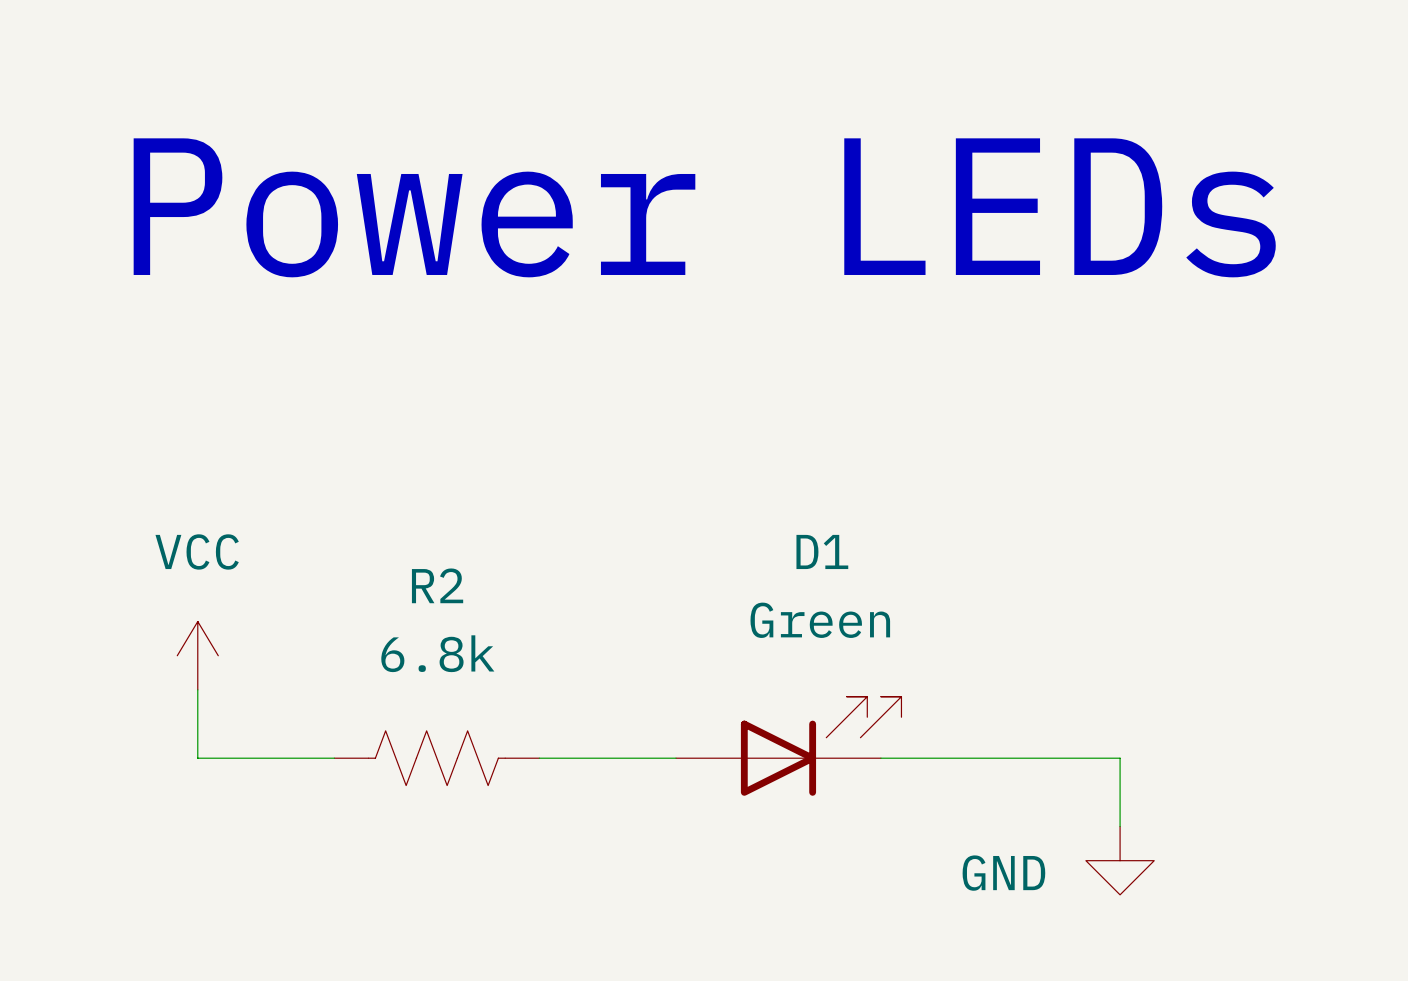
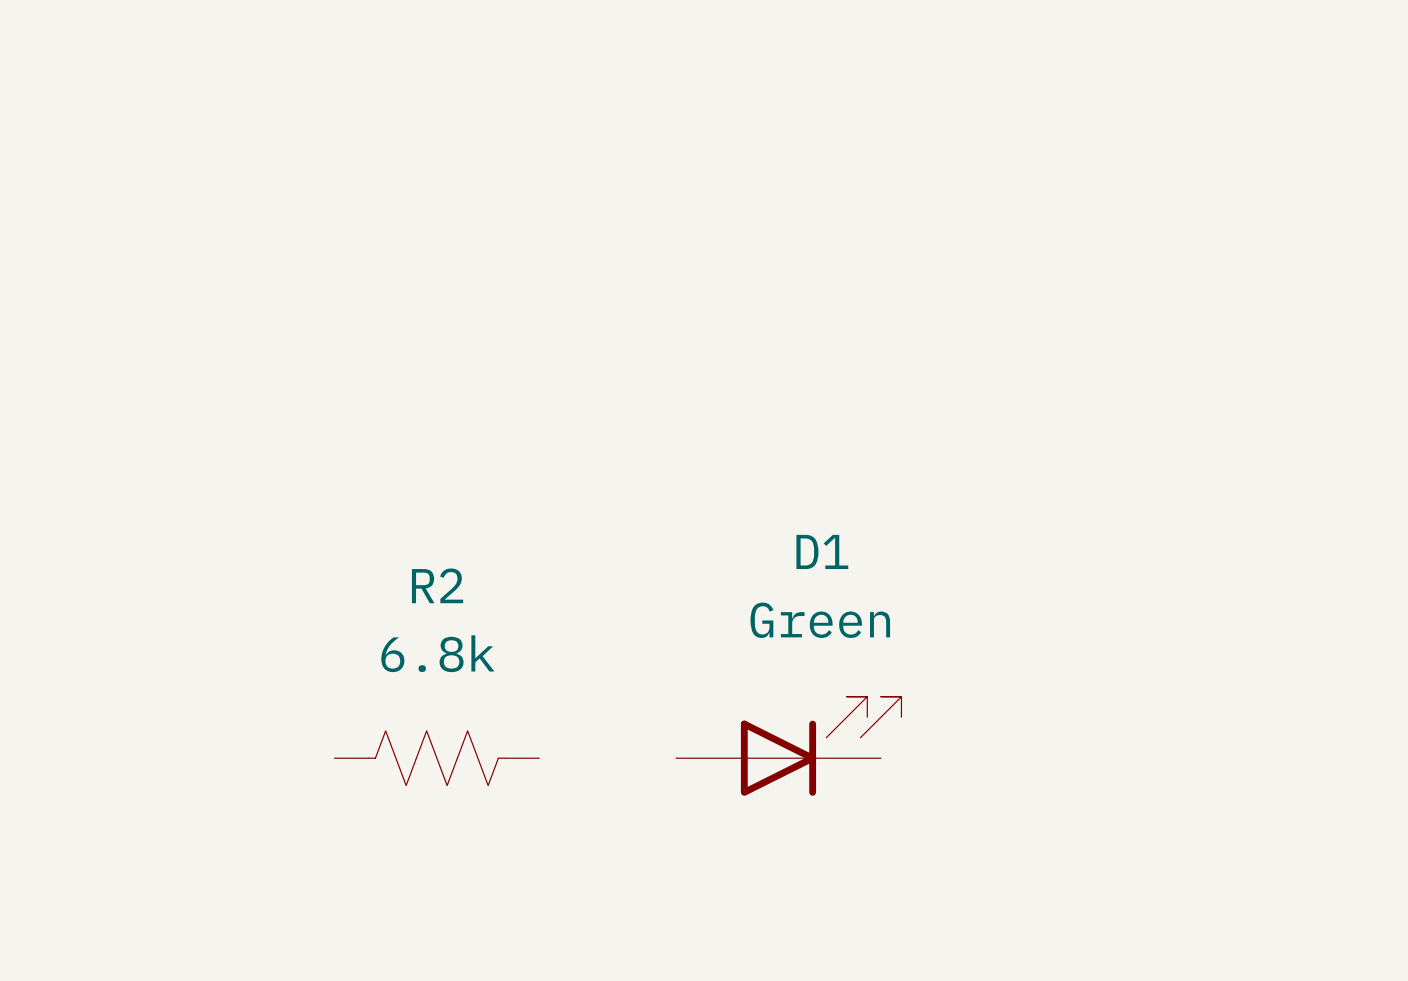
text: Power LEDs (704, 207) -> none
power symbol: VCC (197, 655) -> none
wire: (197, 689) (197, 758) (334, 758) -> none
wire: (539, 758) (676, 758) -> none
wire: (880, 758) (1120, 758) (1120, 826) -> none
power symbol: GND (1120, 860) -> none

